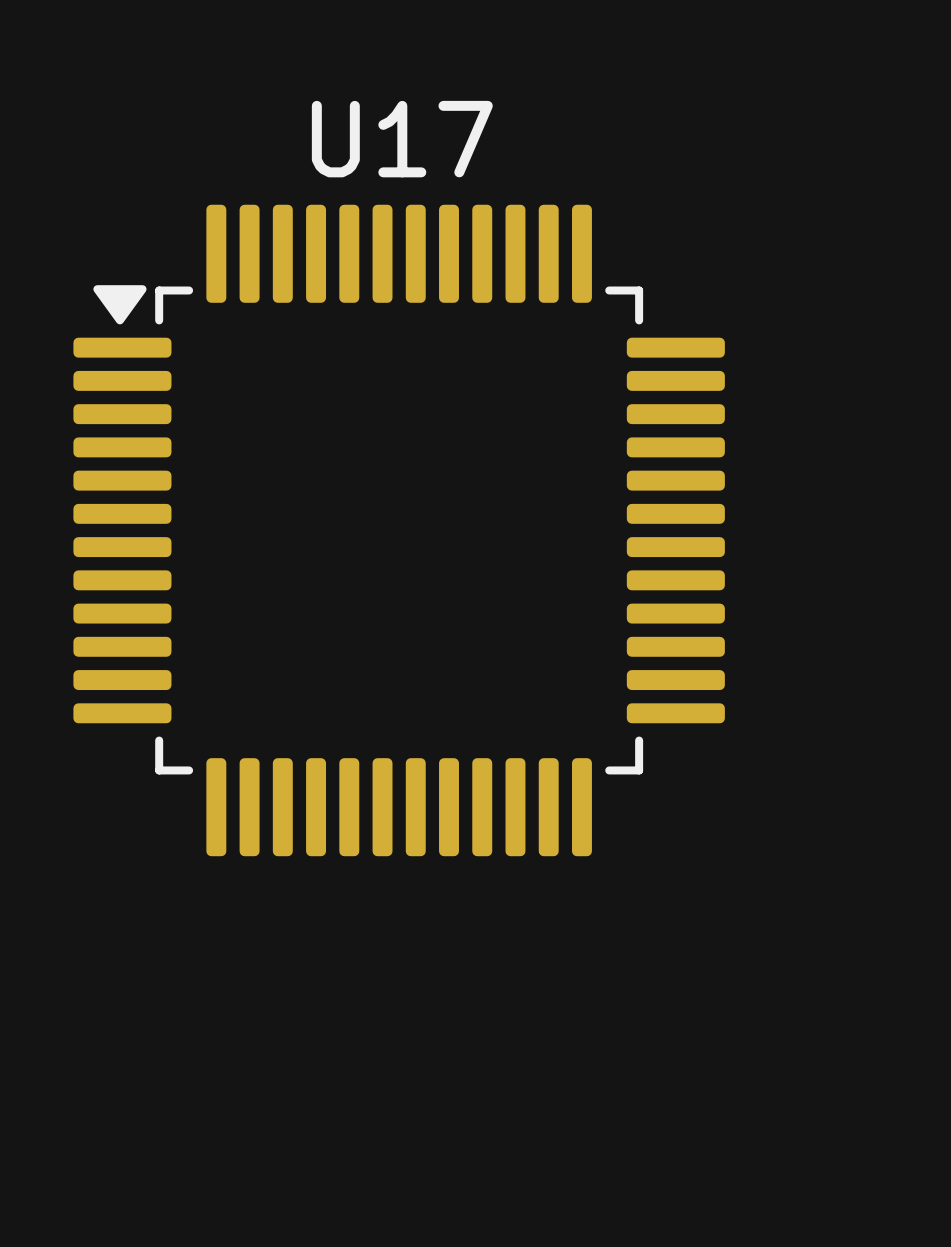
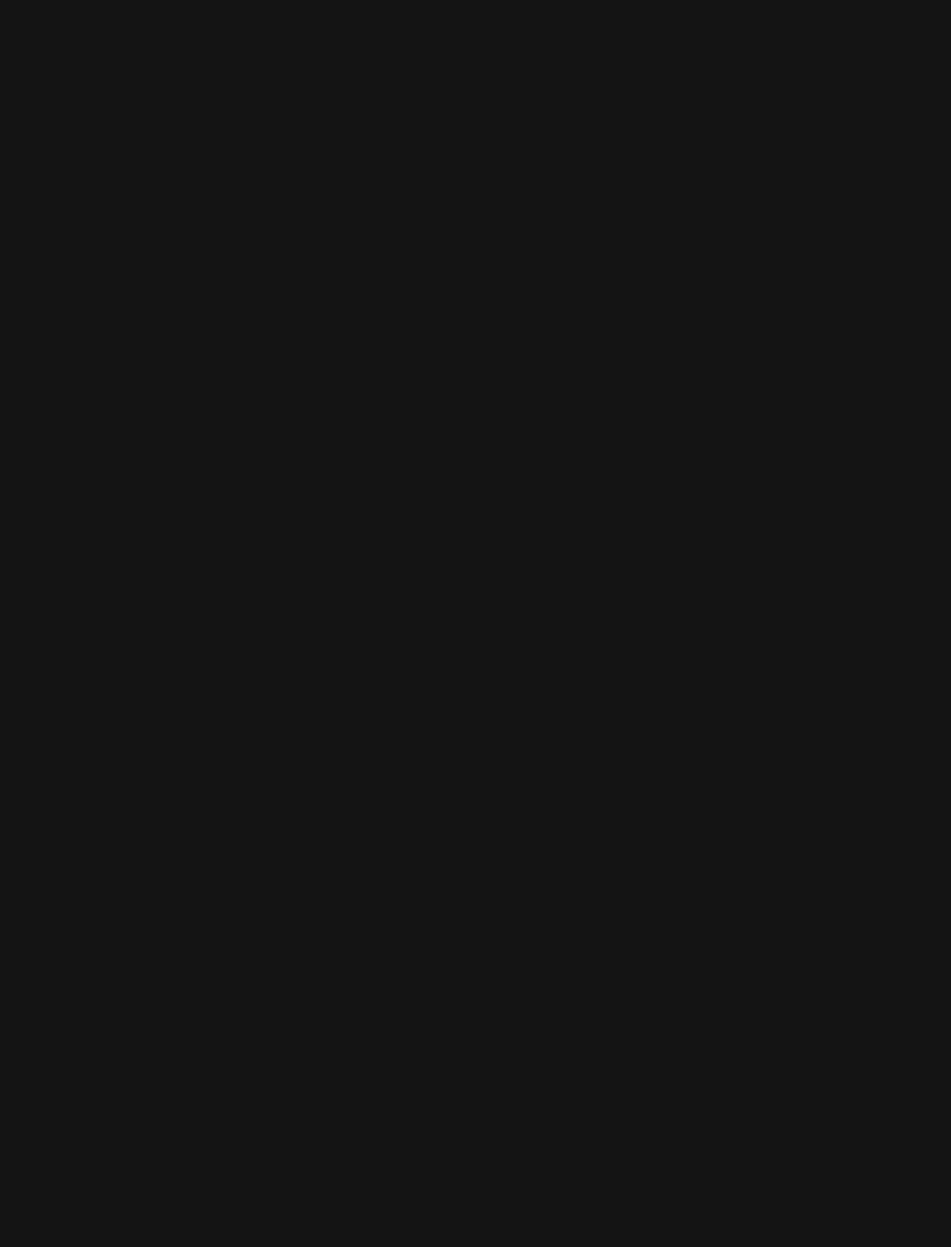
U17: (399, 530) -> none

